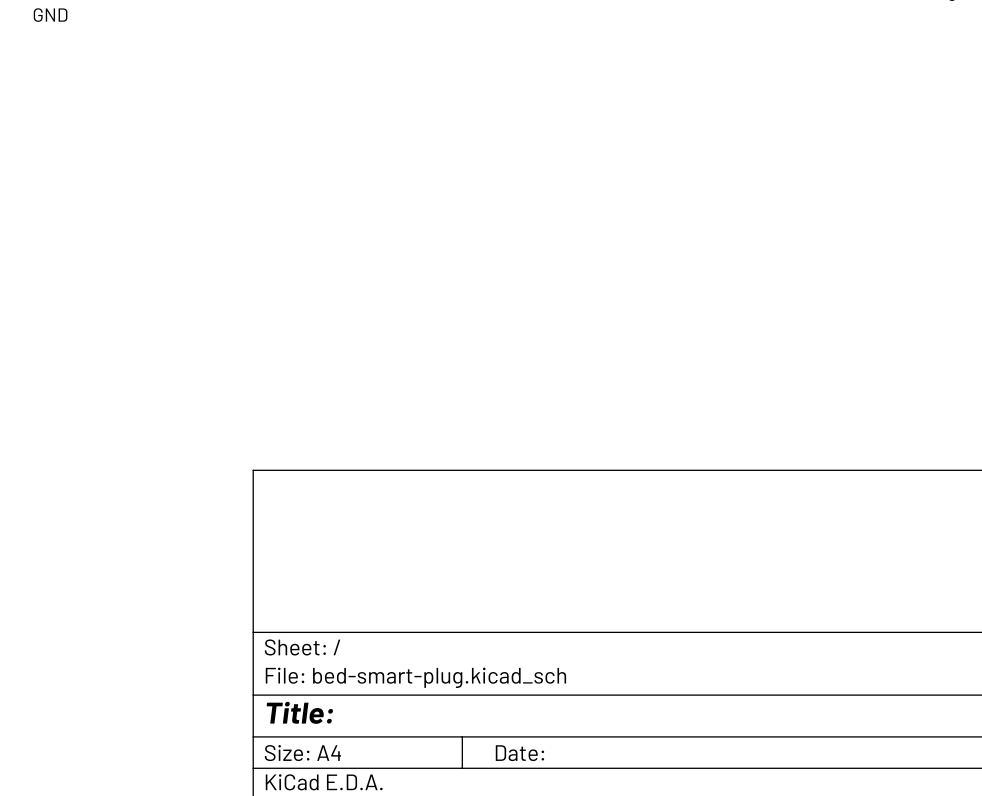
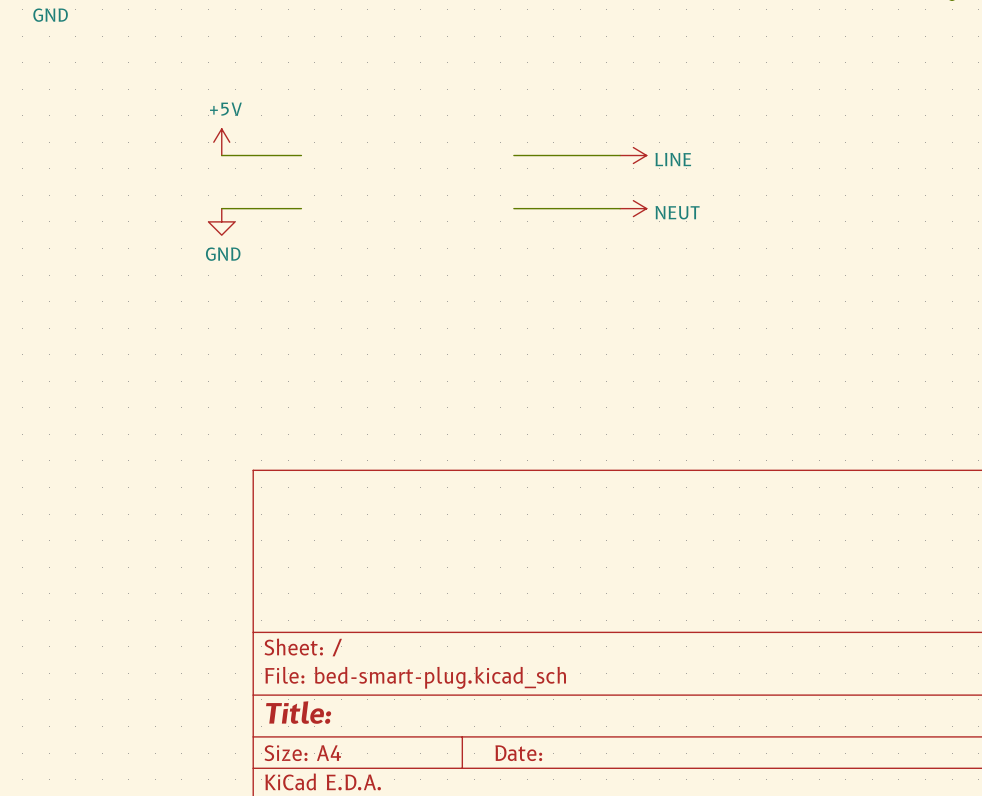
power symbol: none -> +5V (221, 142)
wire: none -> (221, 155) (301, 155)
wire: none -> (513, 155) (620, 155)
power symbol: none -> LINE (633, 155)
wire: none -> (221, 208) (301, 208)
wire: none -> (513, 208) (620, 208)
power symbol: none -> NEUT (633, 208)
power symbol: none -> GND (221, 221)

